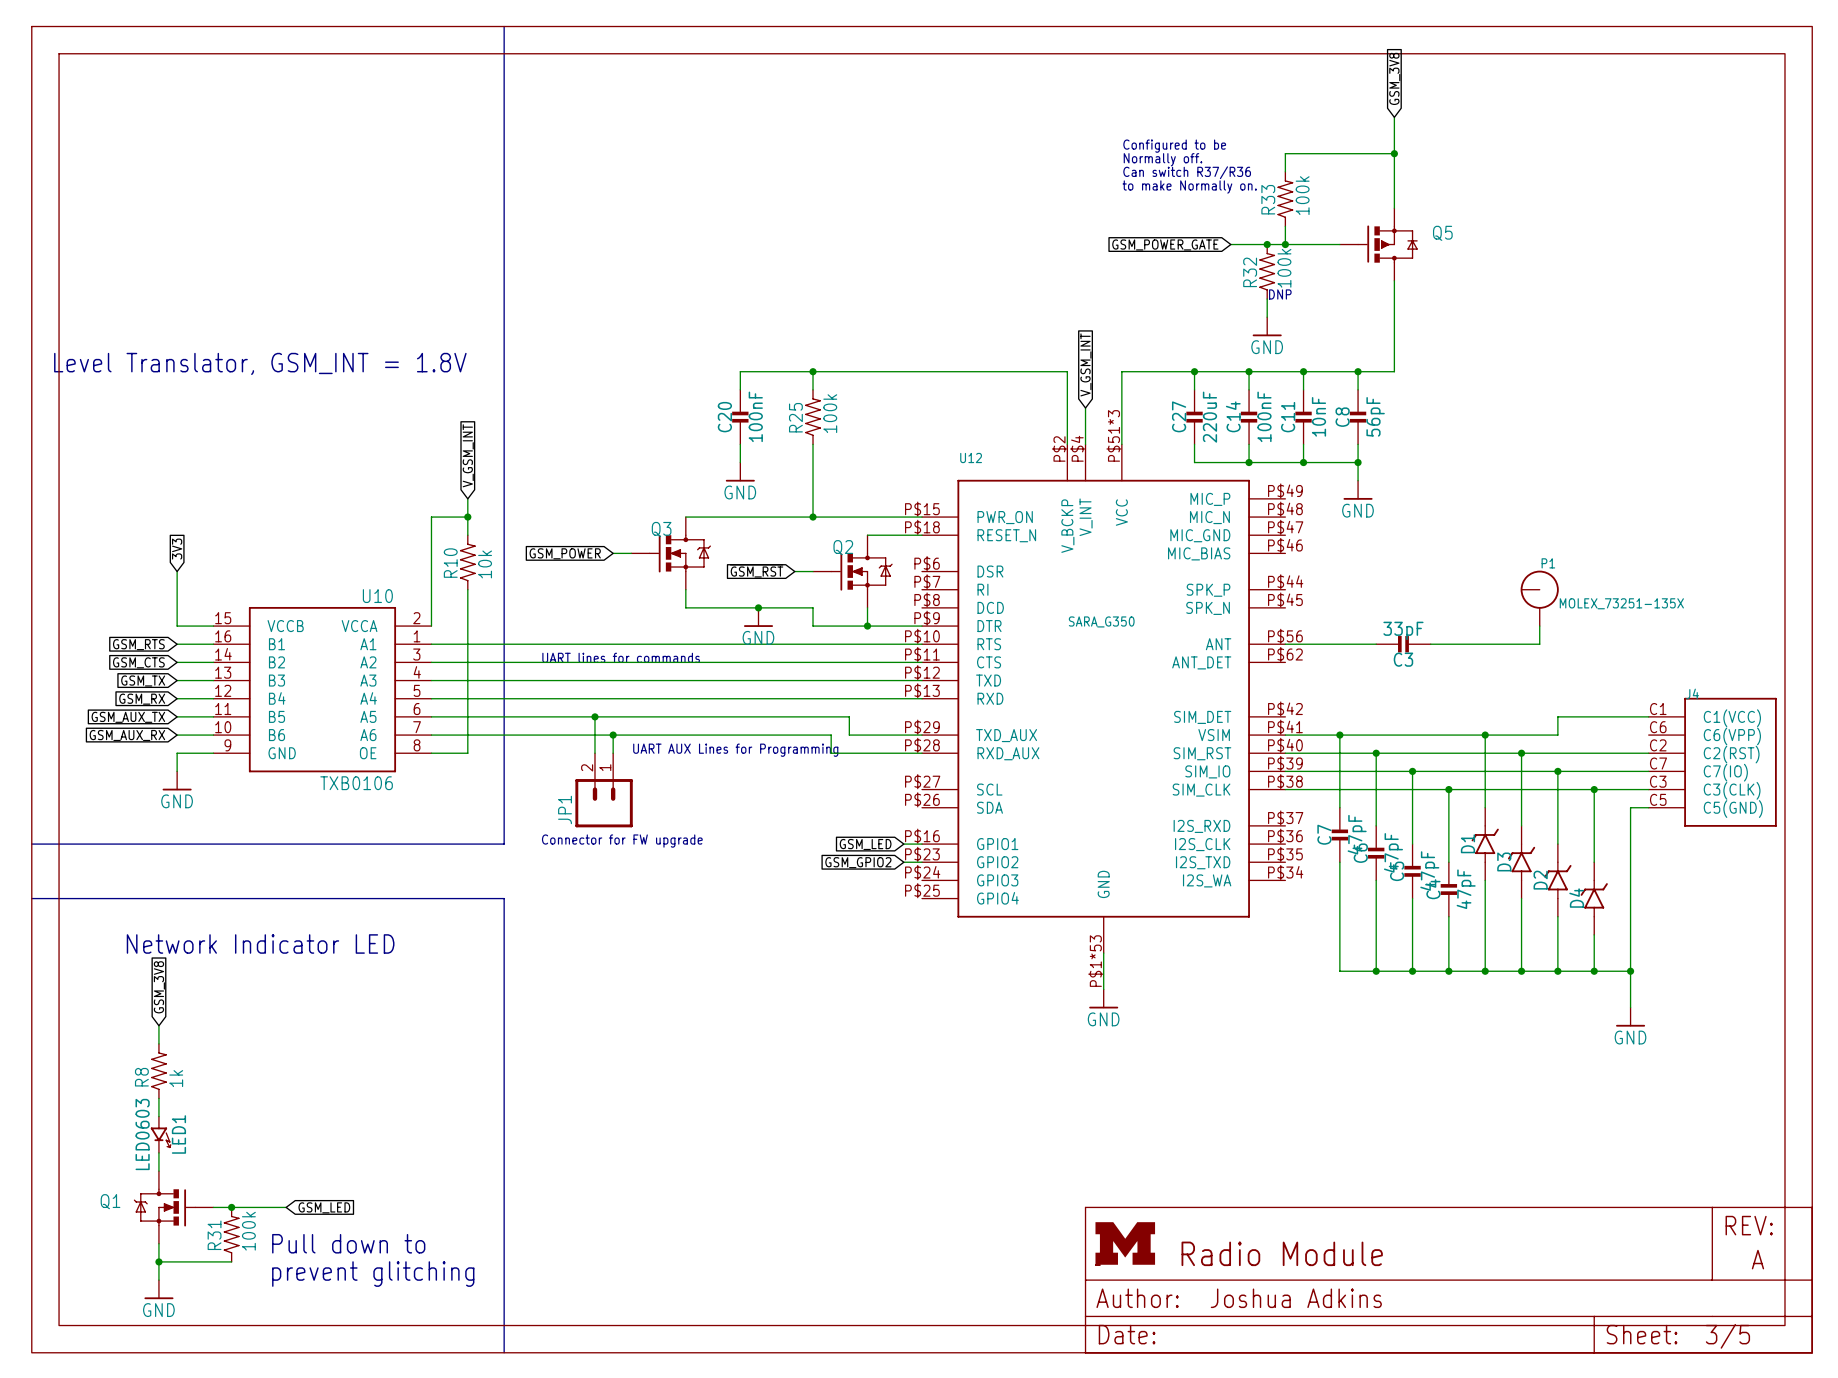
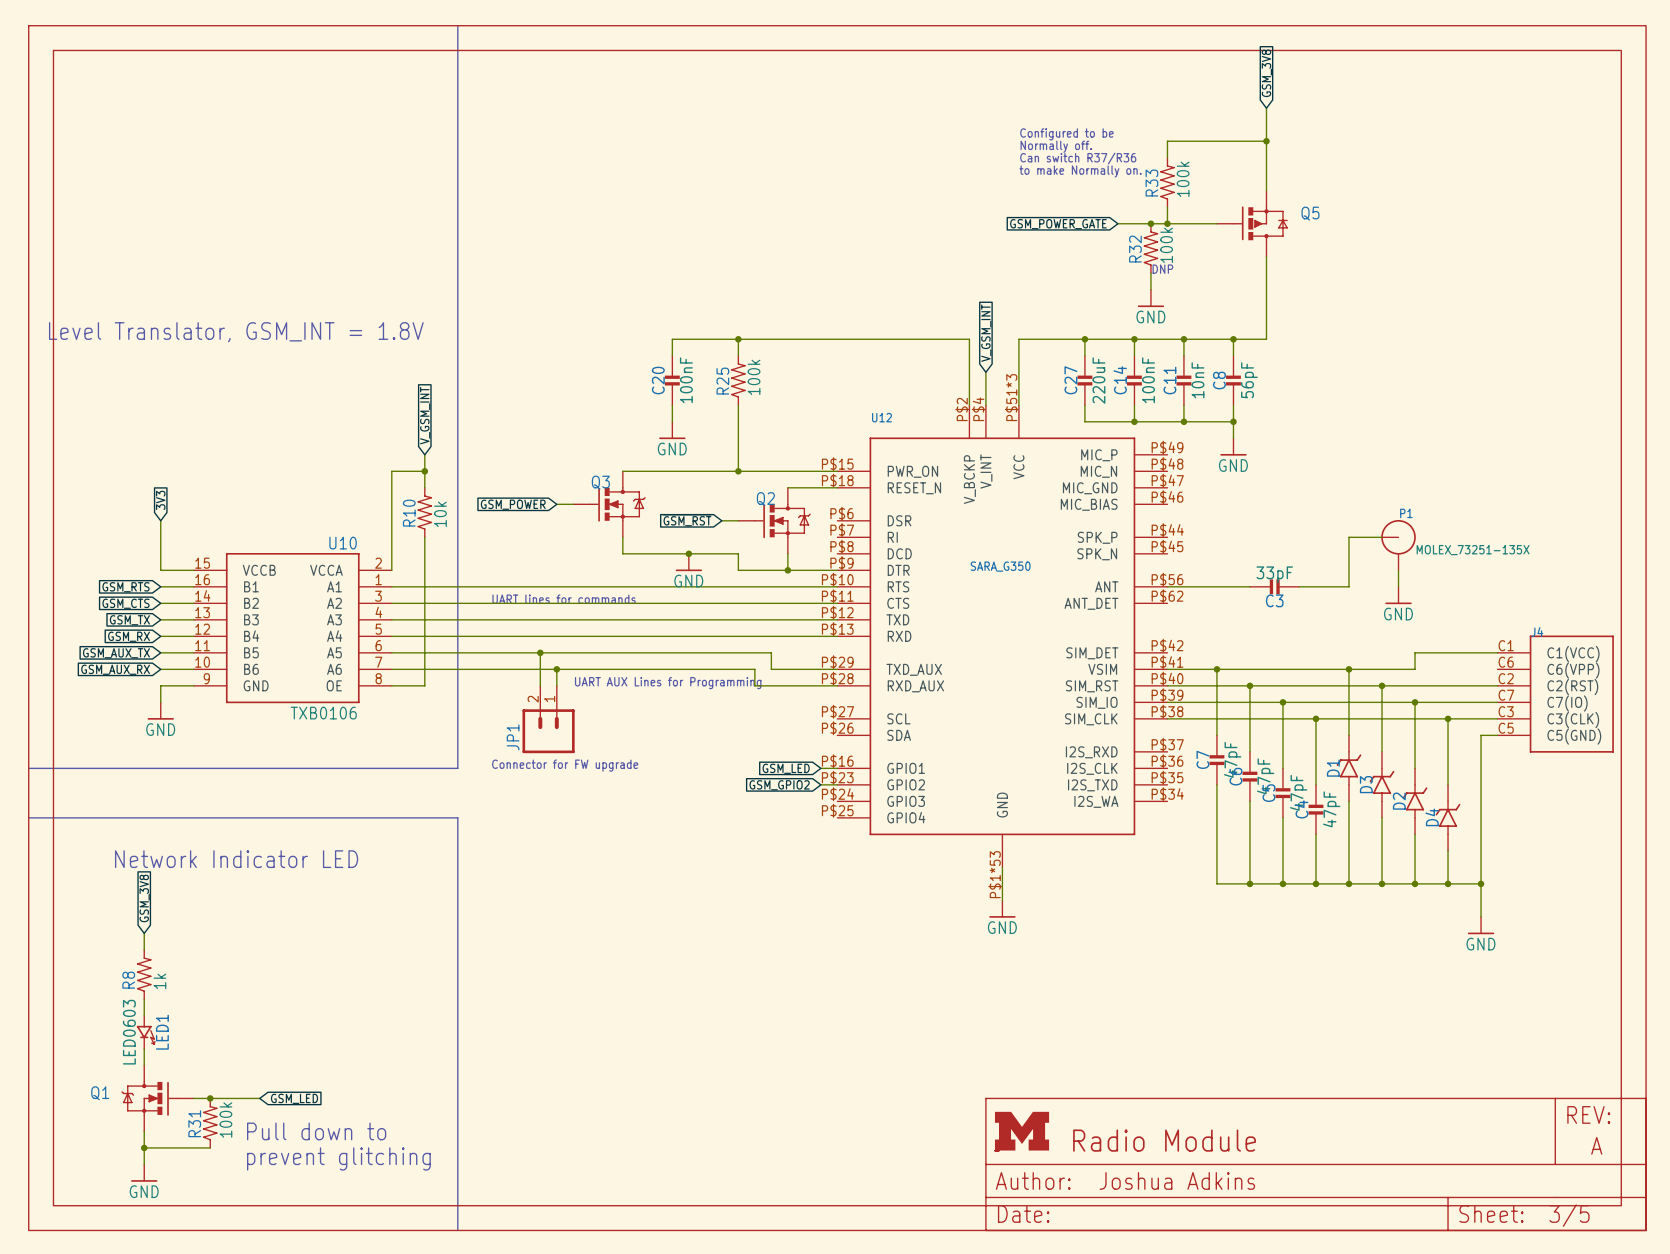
wire: (1485, 644) (1539, 644) -> (1348, 586) (1348, 537) (1382, 537)
power symbol: none -> GND (1398, 595)

